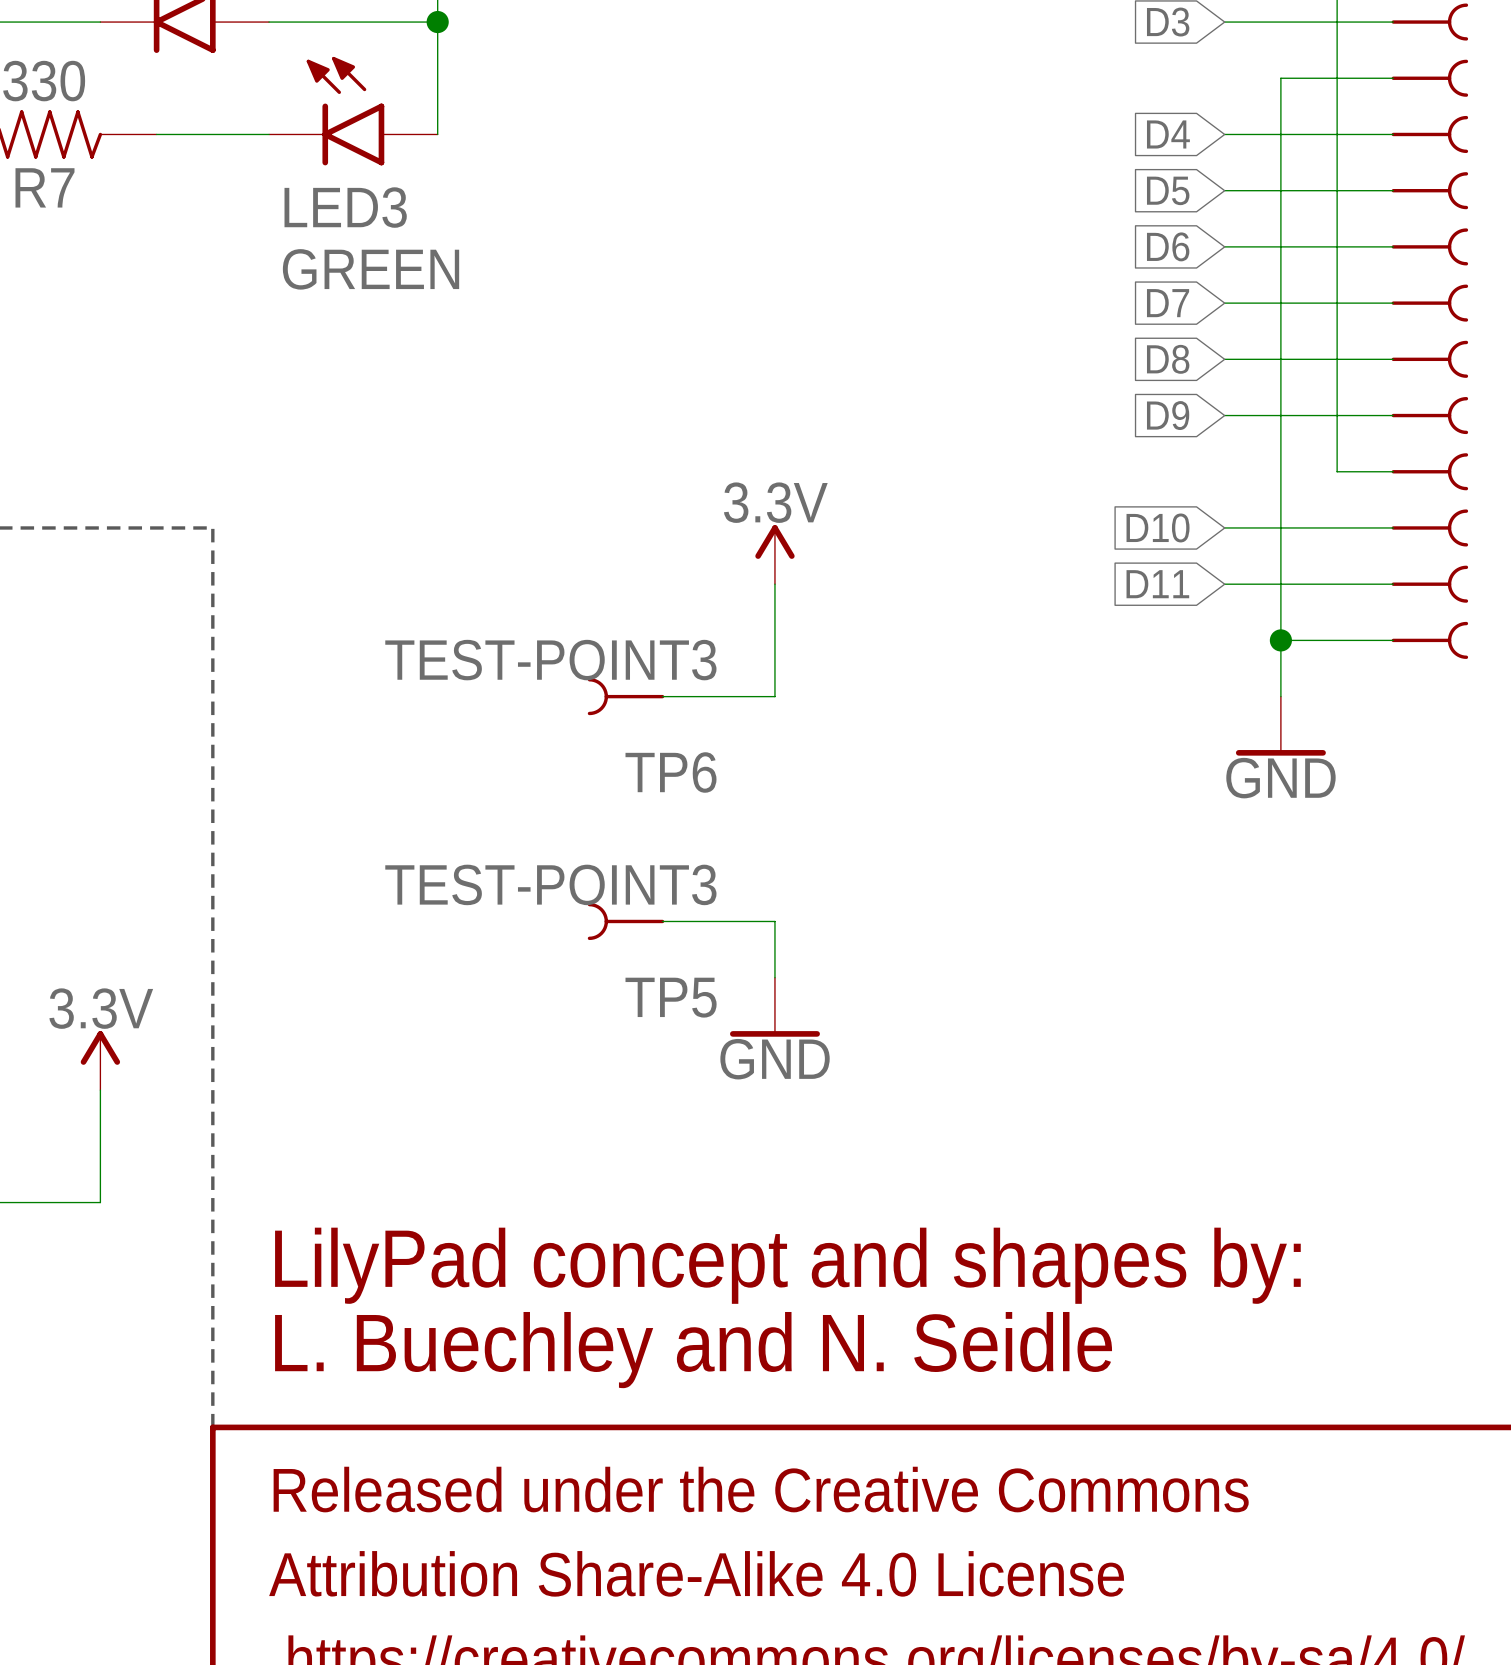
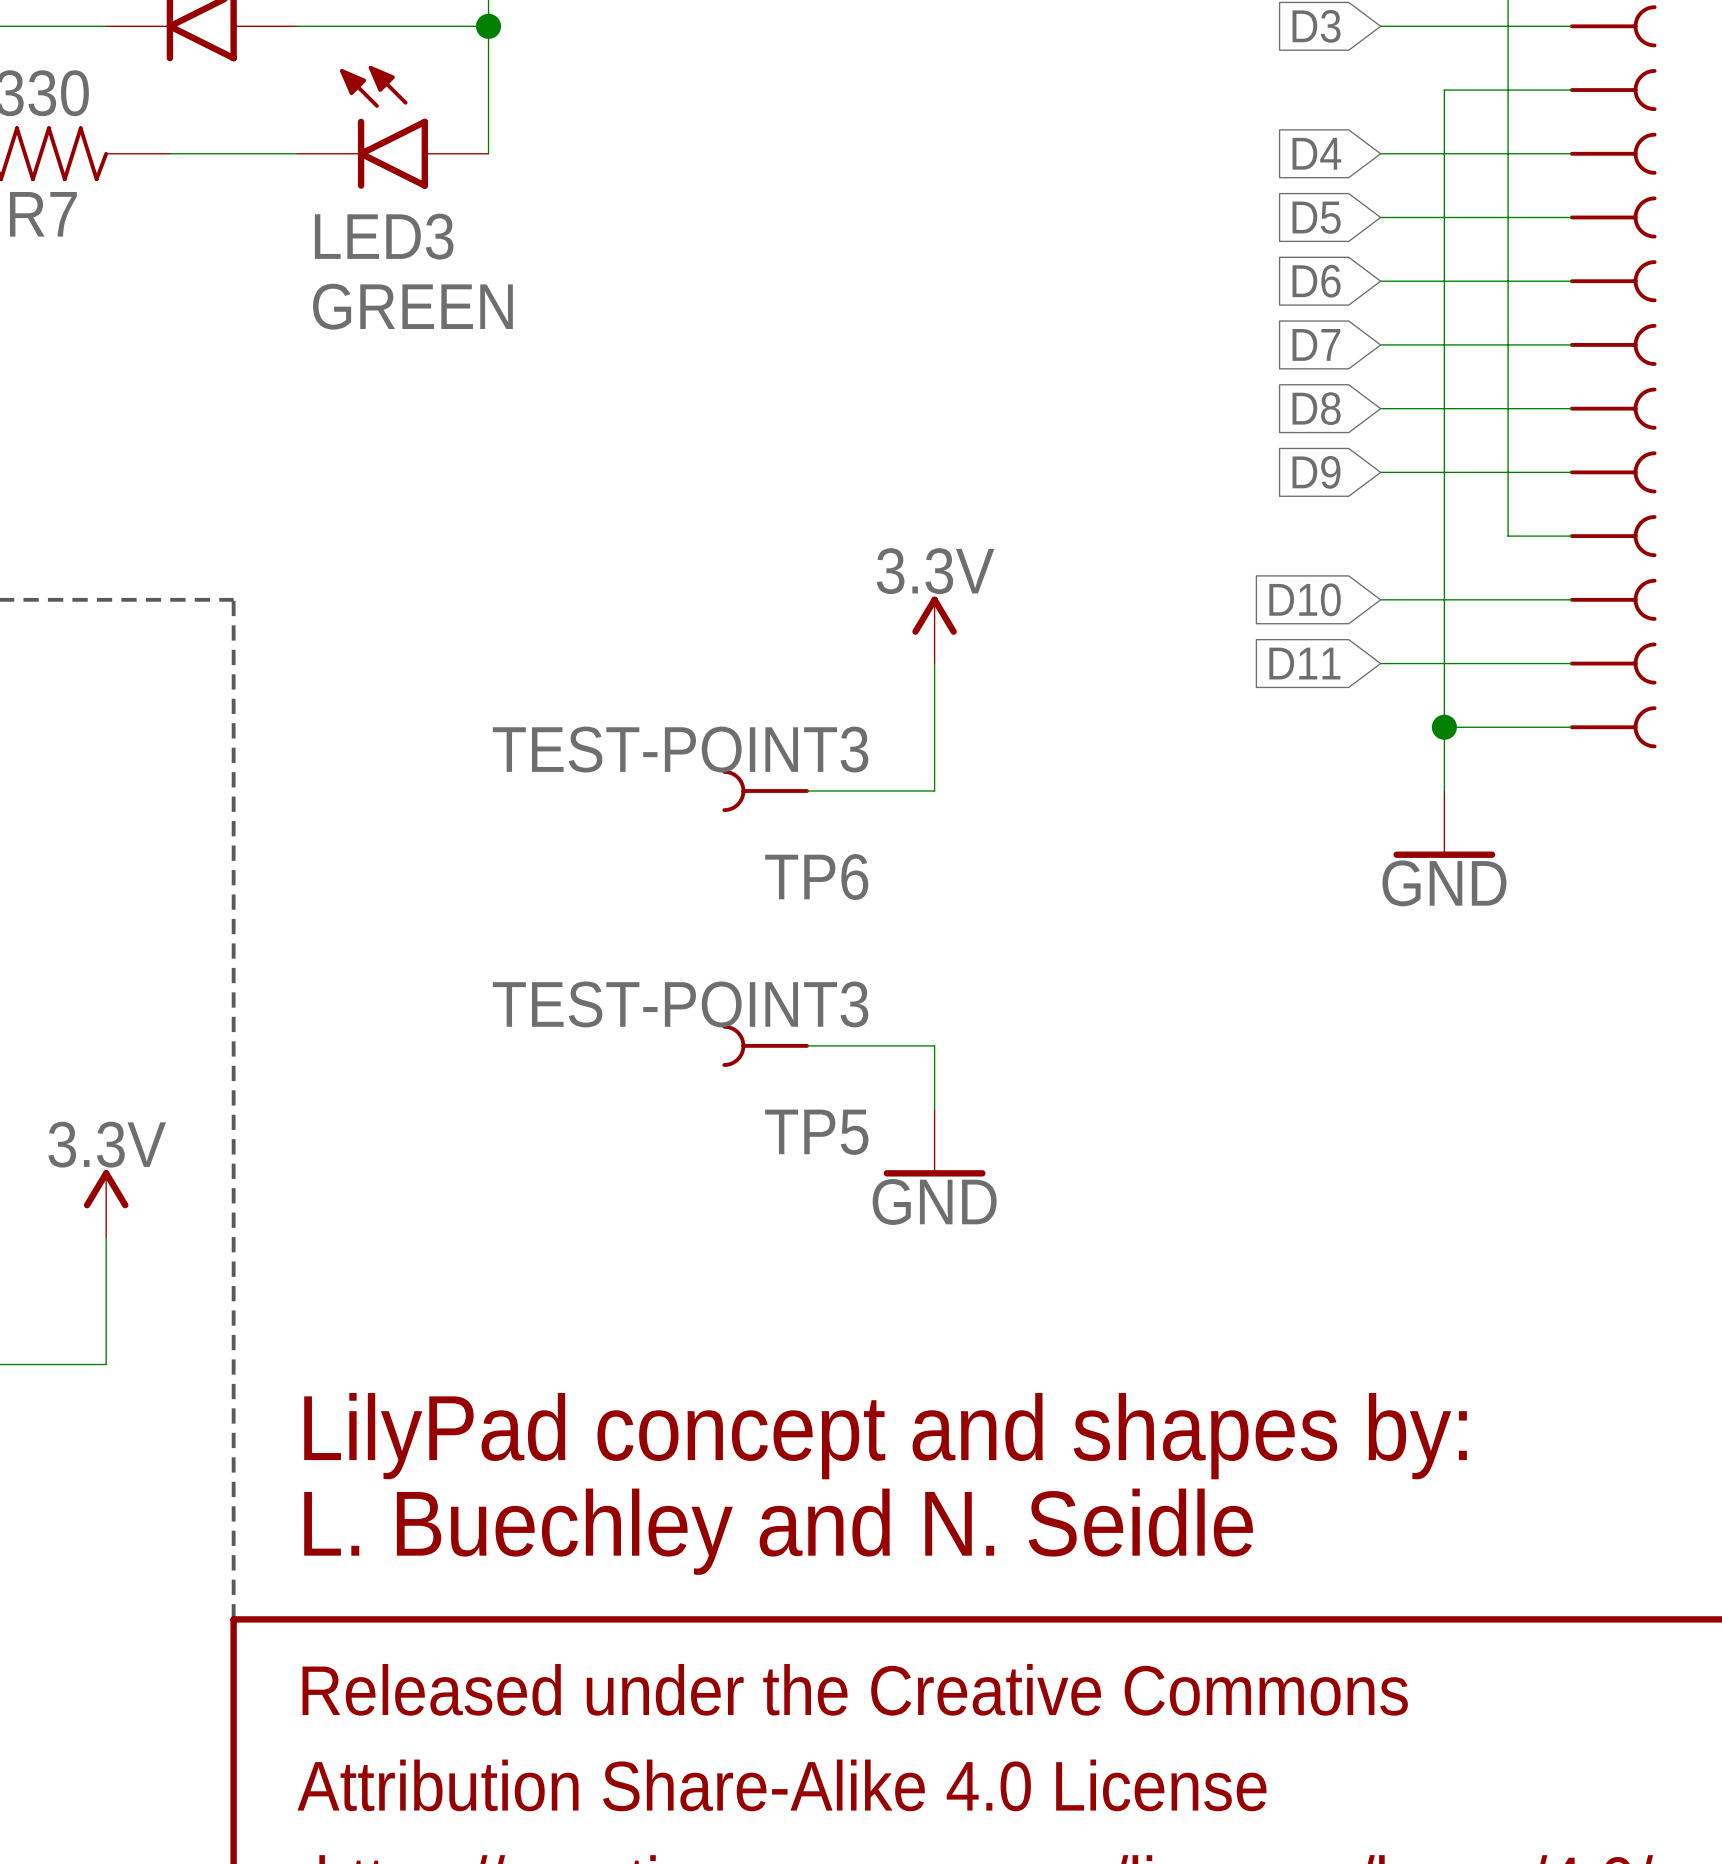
power symbol position: 3.3V (774, 554) -> 3.3V (934, 630)
wire: (774, 584) (774, 696) -> (934, 663) (934, 790) (870, 790)
TP6 position: (626, 696) -> (765, 790)
TP5 position: (626, 921) -> (765, 1045)
wire: (774, 921) (774, 977) -> (870, 1045) (934, 1045) (934, 1109)
power symbol position: GND (774, 1007) -> GND (934, 1143)

